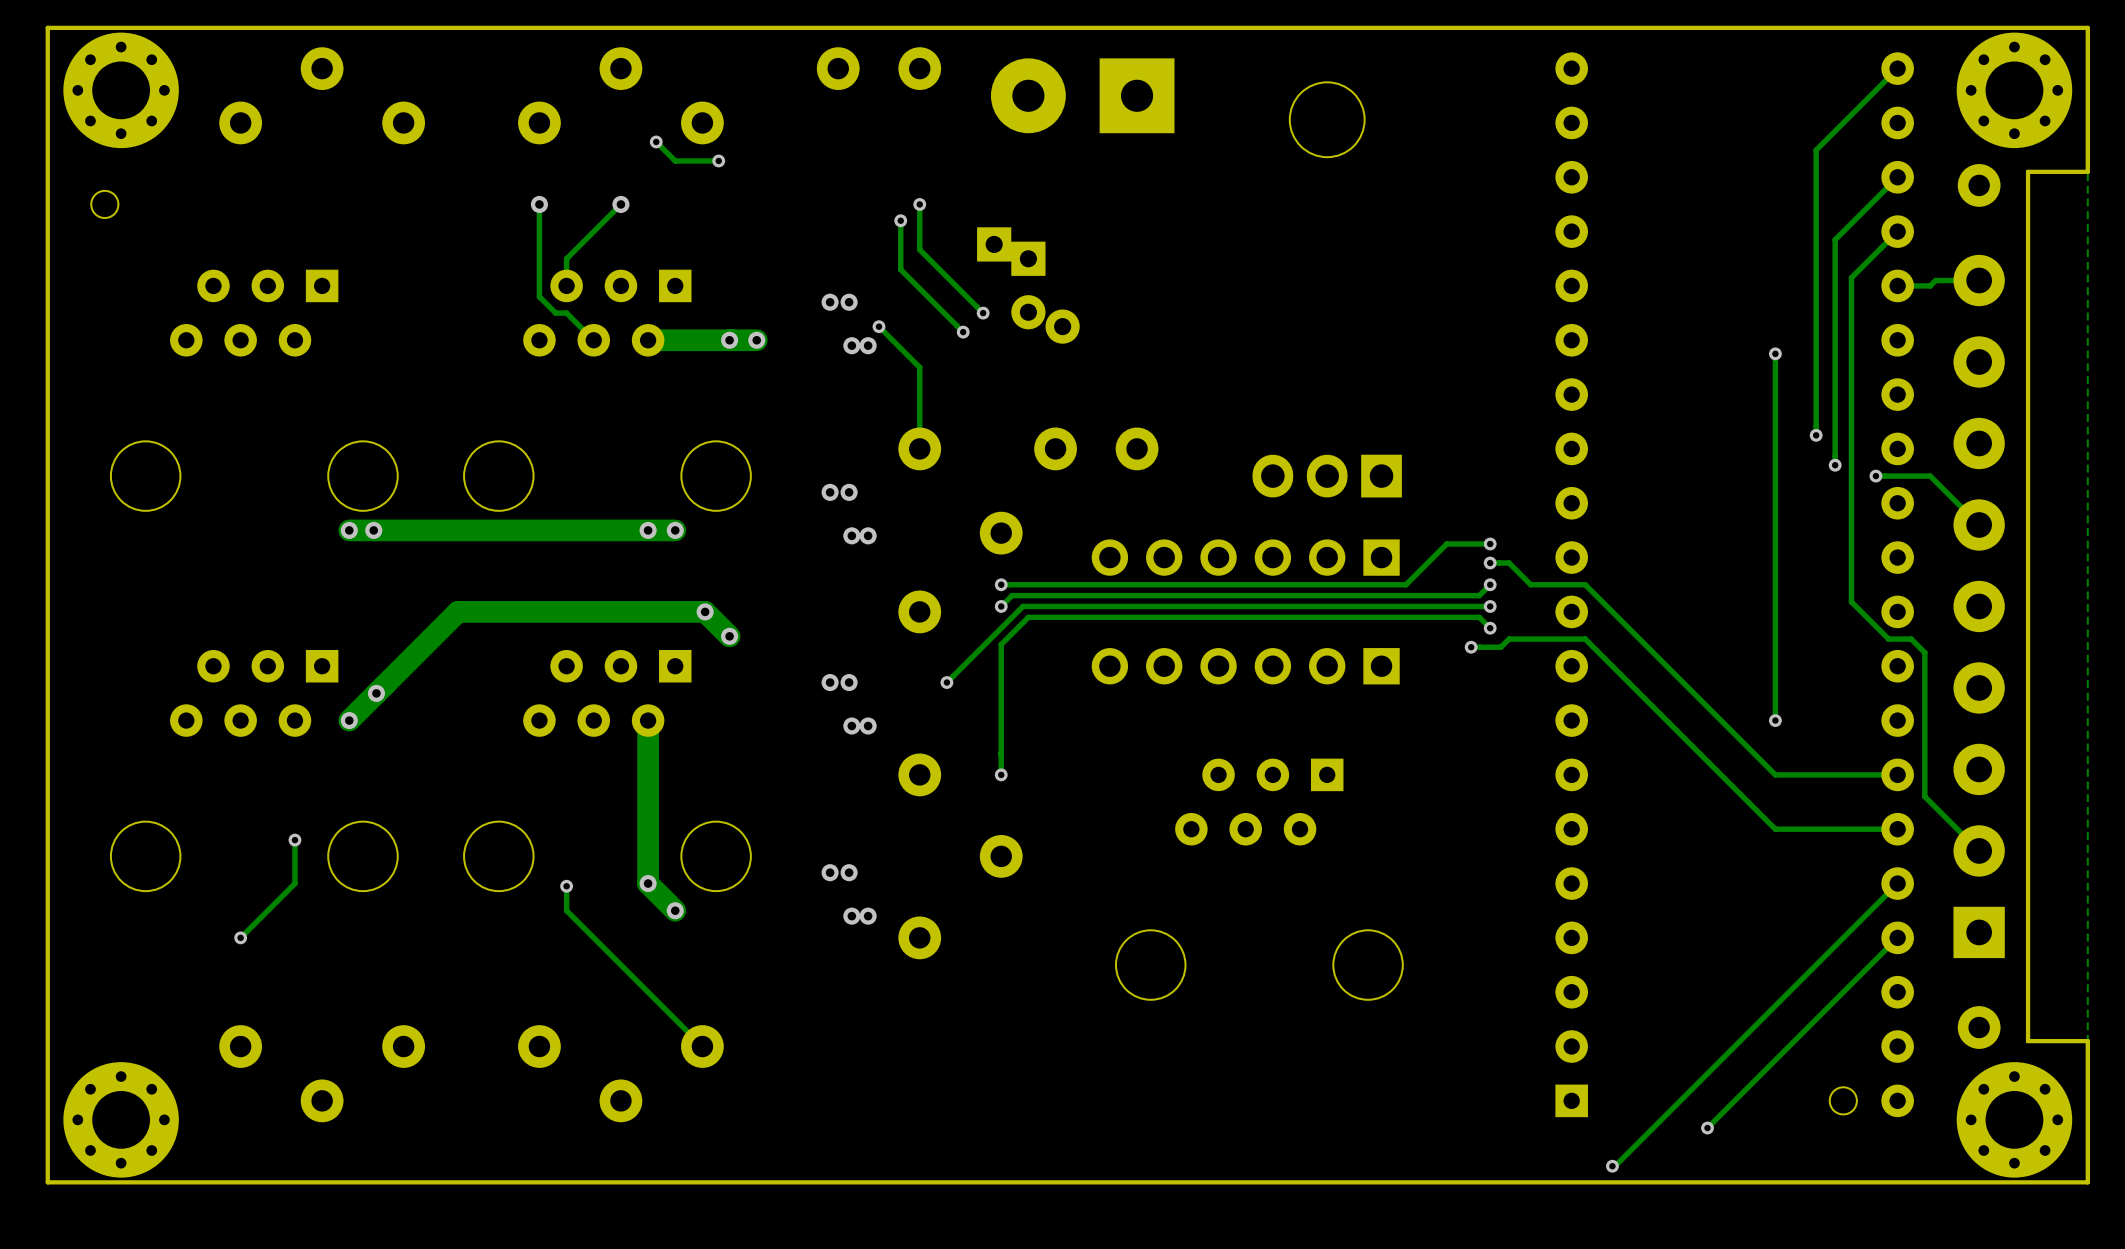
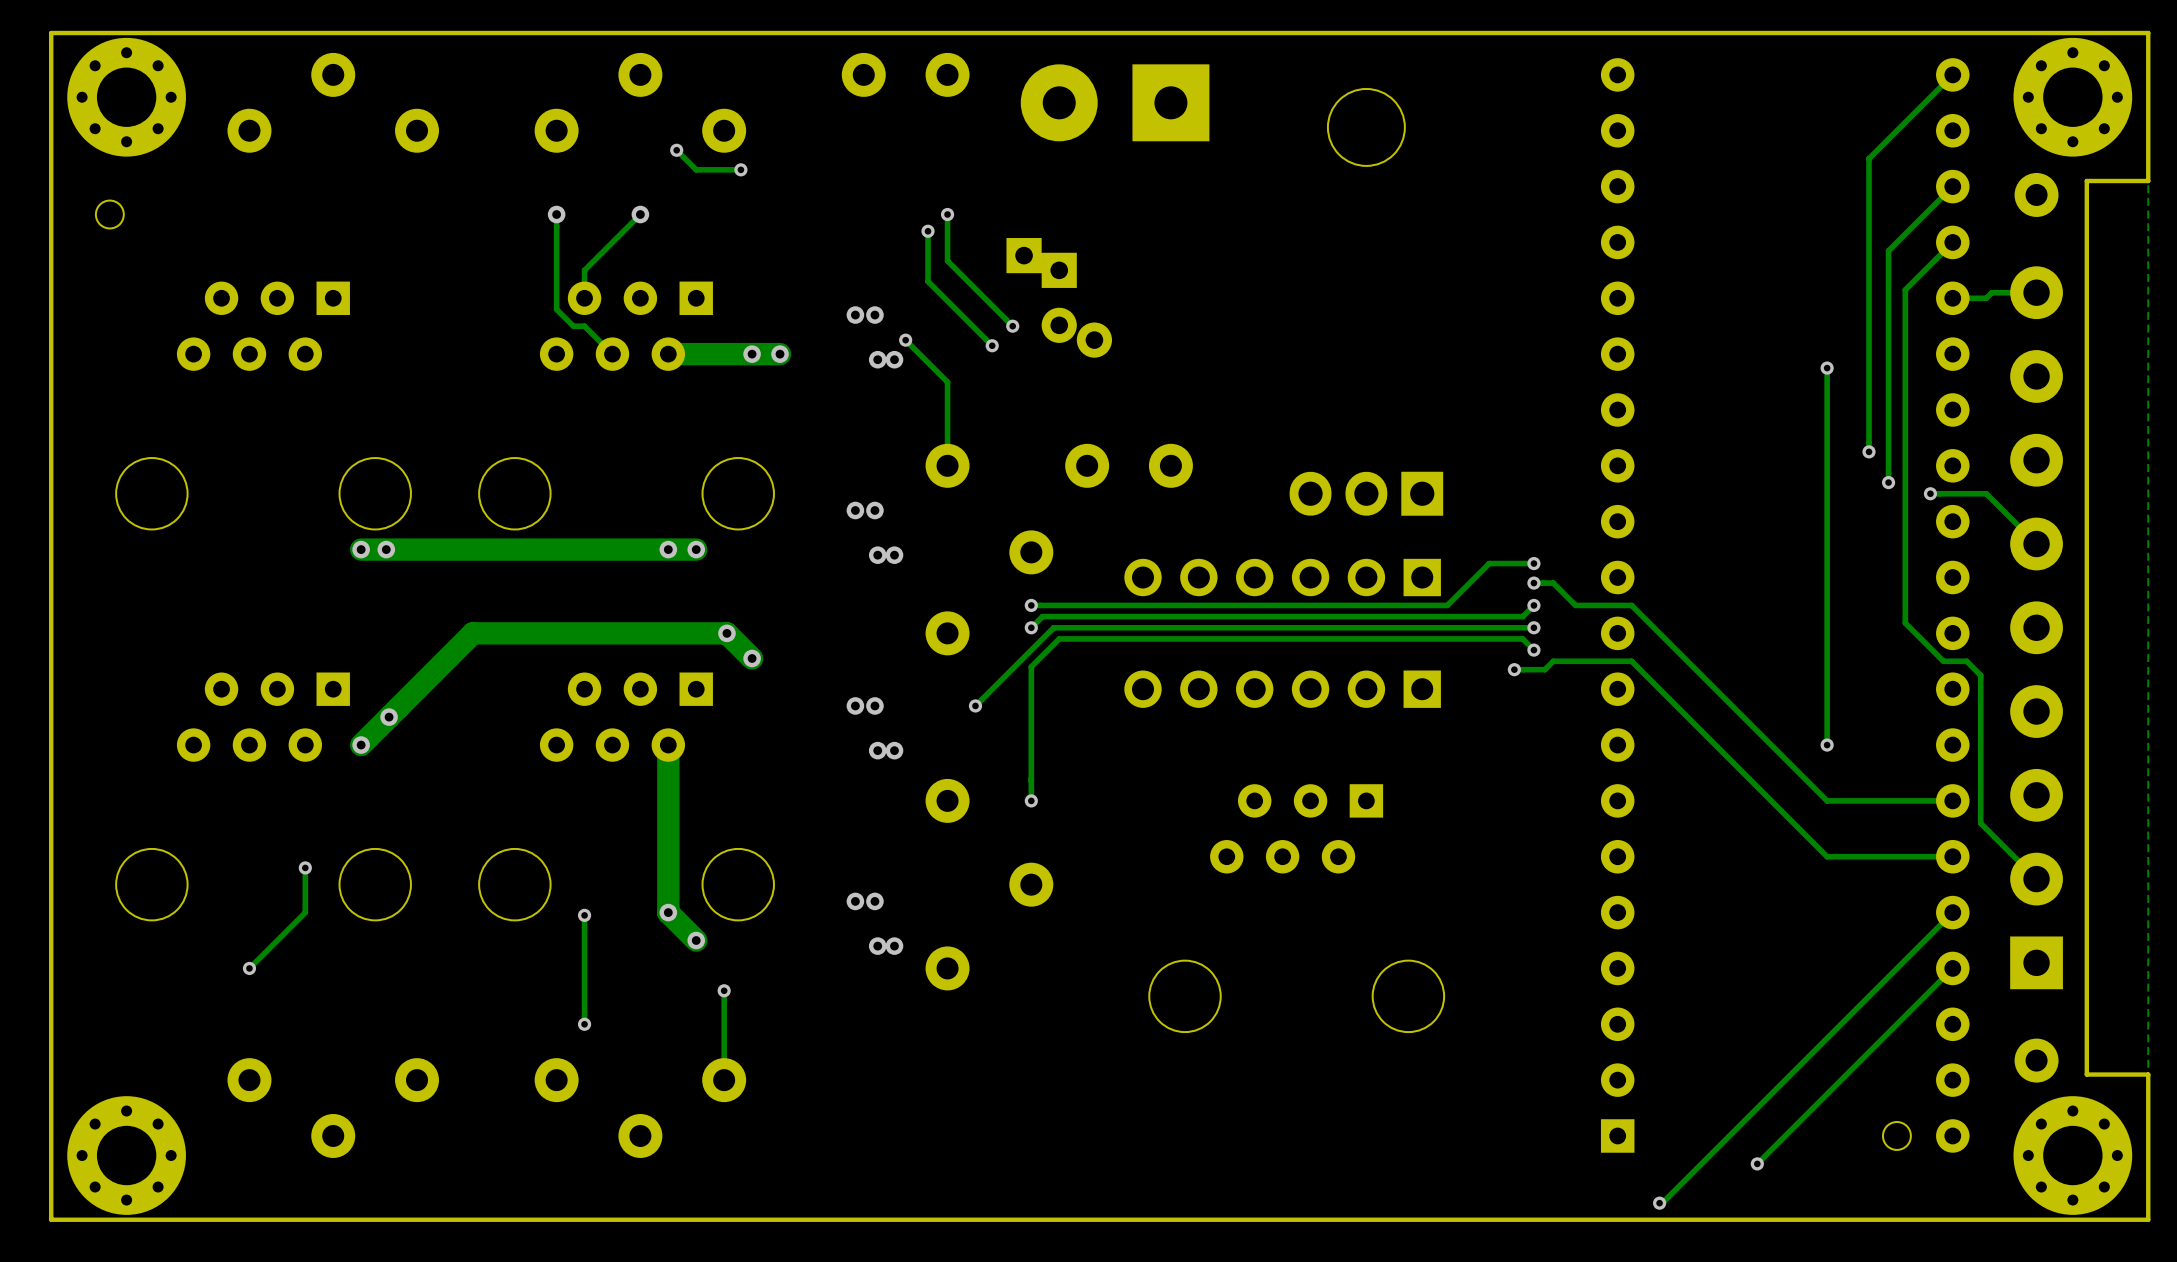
track: (566, 910) (702, 1046) -> (724, 990) (724, 1080)
track: none -> (584, 940) (584, 1024)
via: none -> (724, 990)
via: none -> (584, 1024)

